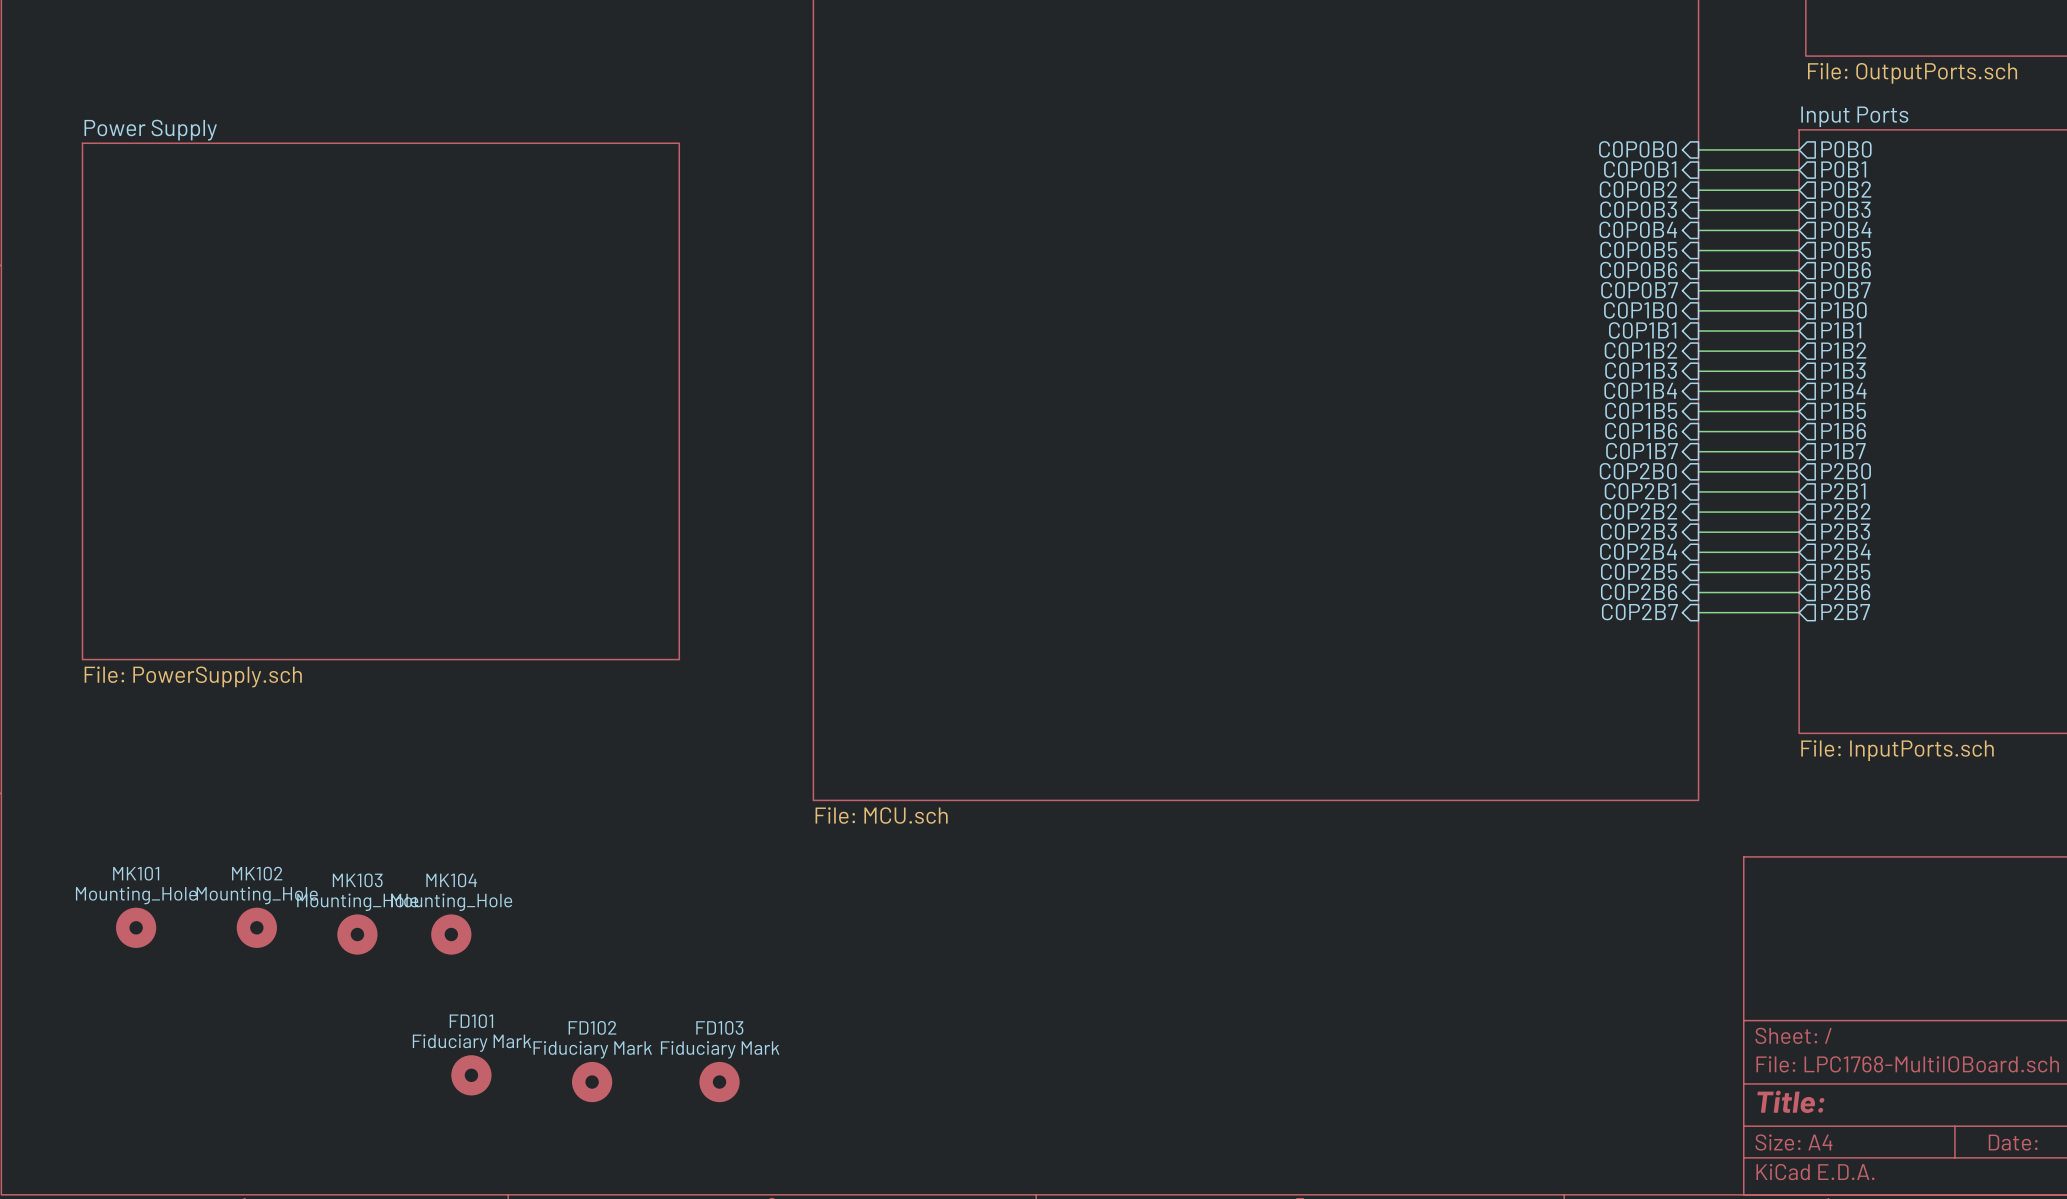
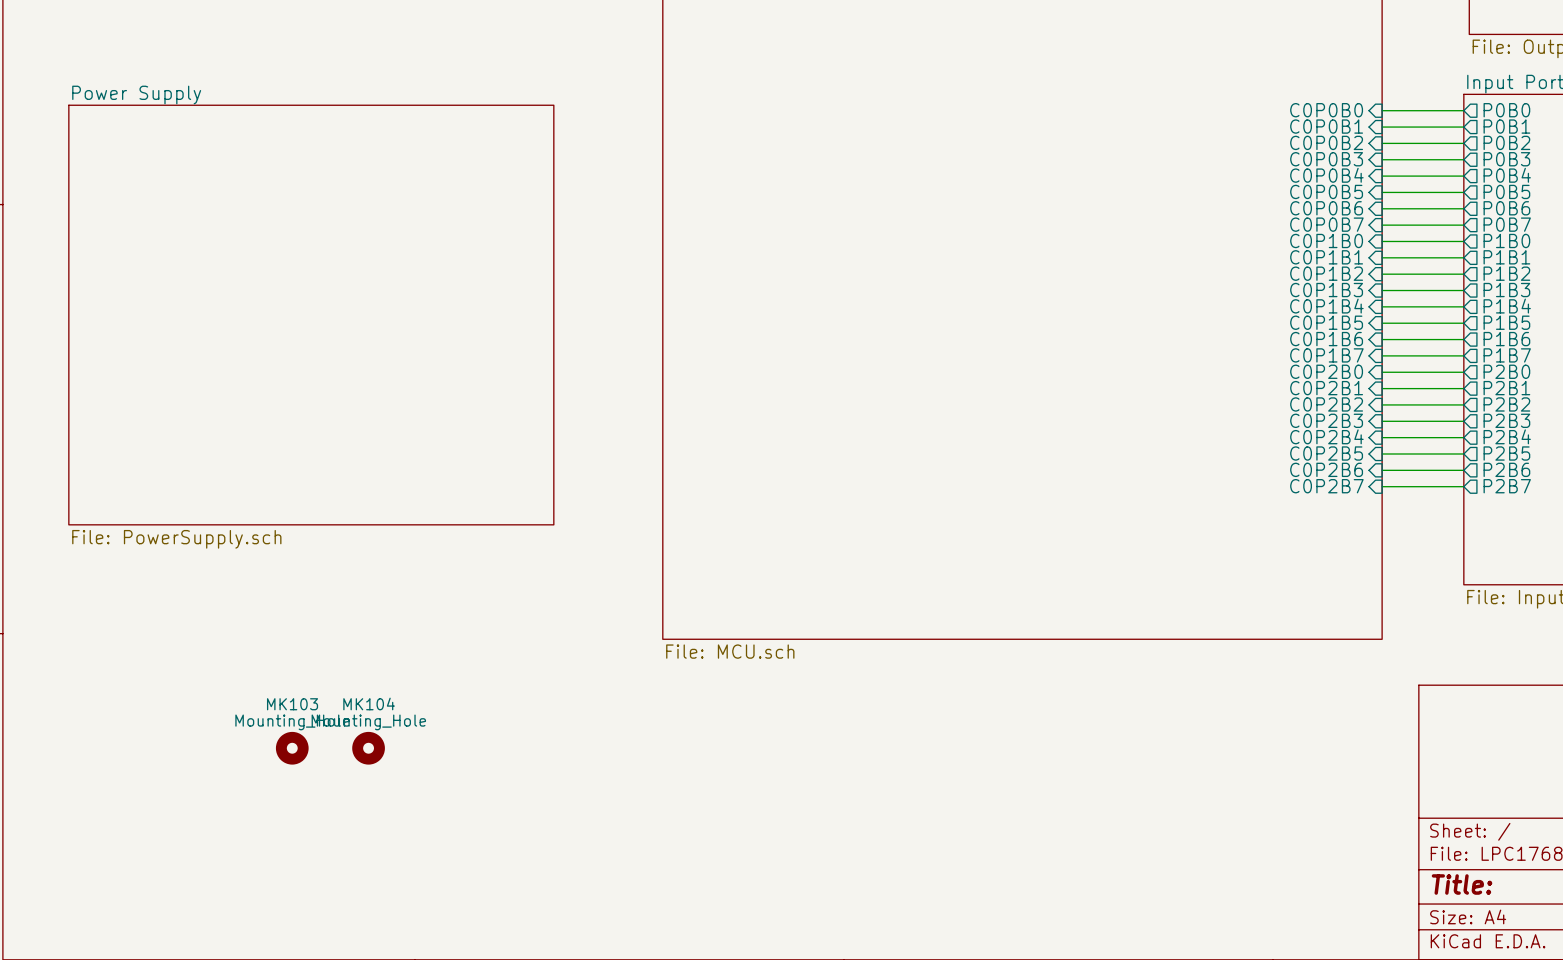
MK101: Mounting_Hole (136, 927) -> none
MK102: Mounting_Hole (256, 927) -> none
FD101: Fiduciary Mark (471, 1075) -> none
FD102: Fiduciary Mark (592, 1082) -> none
FD103: Fiduciary Mark (719, 1082) -> none

